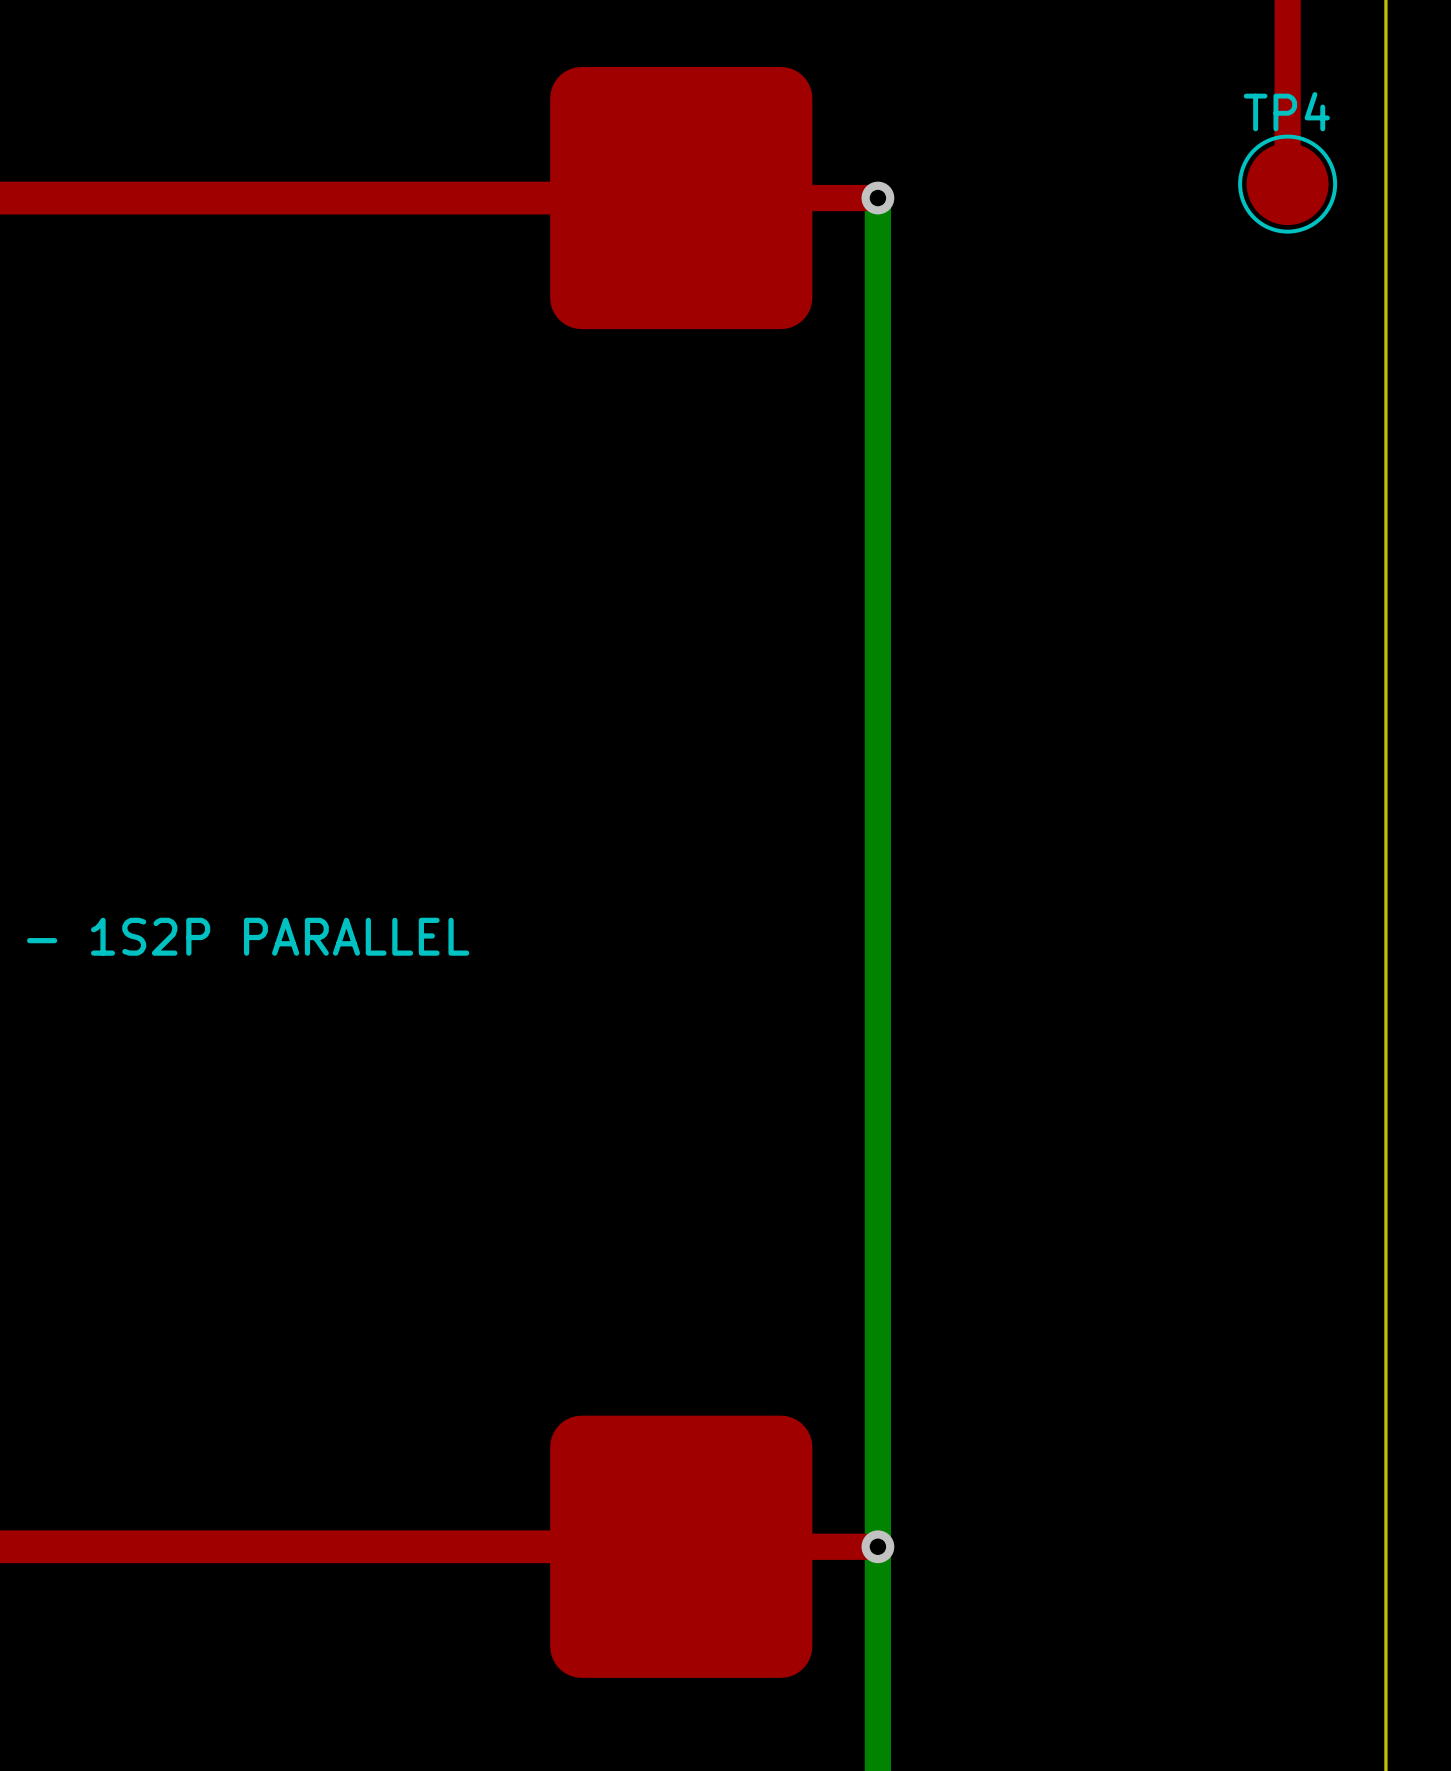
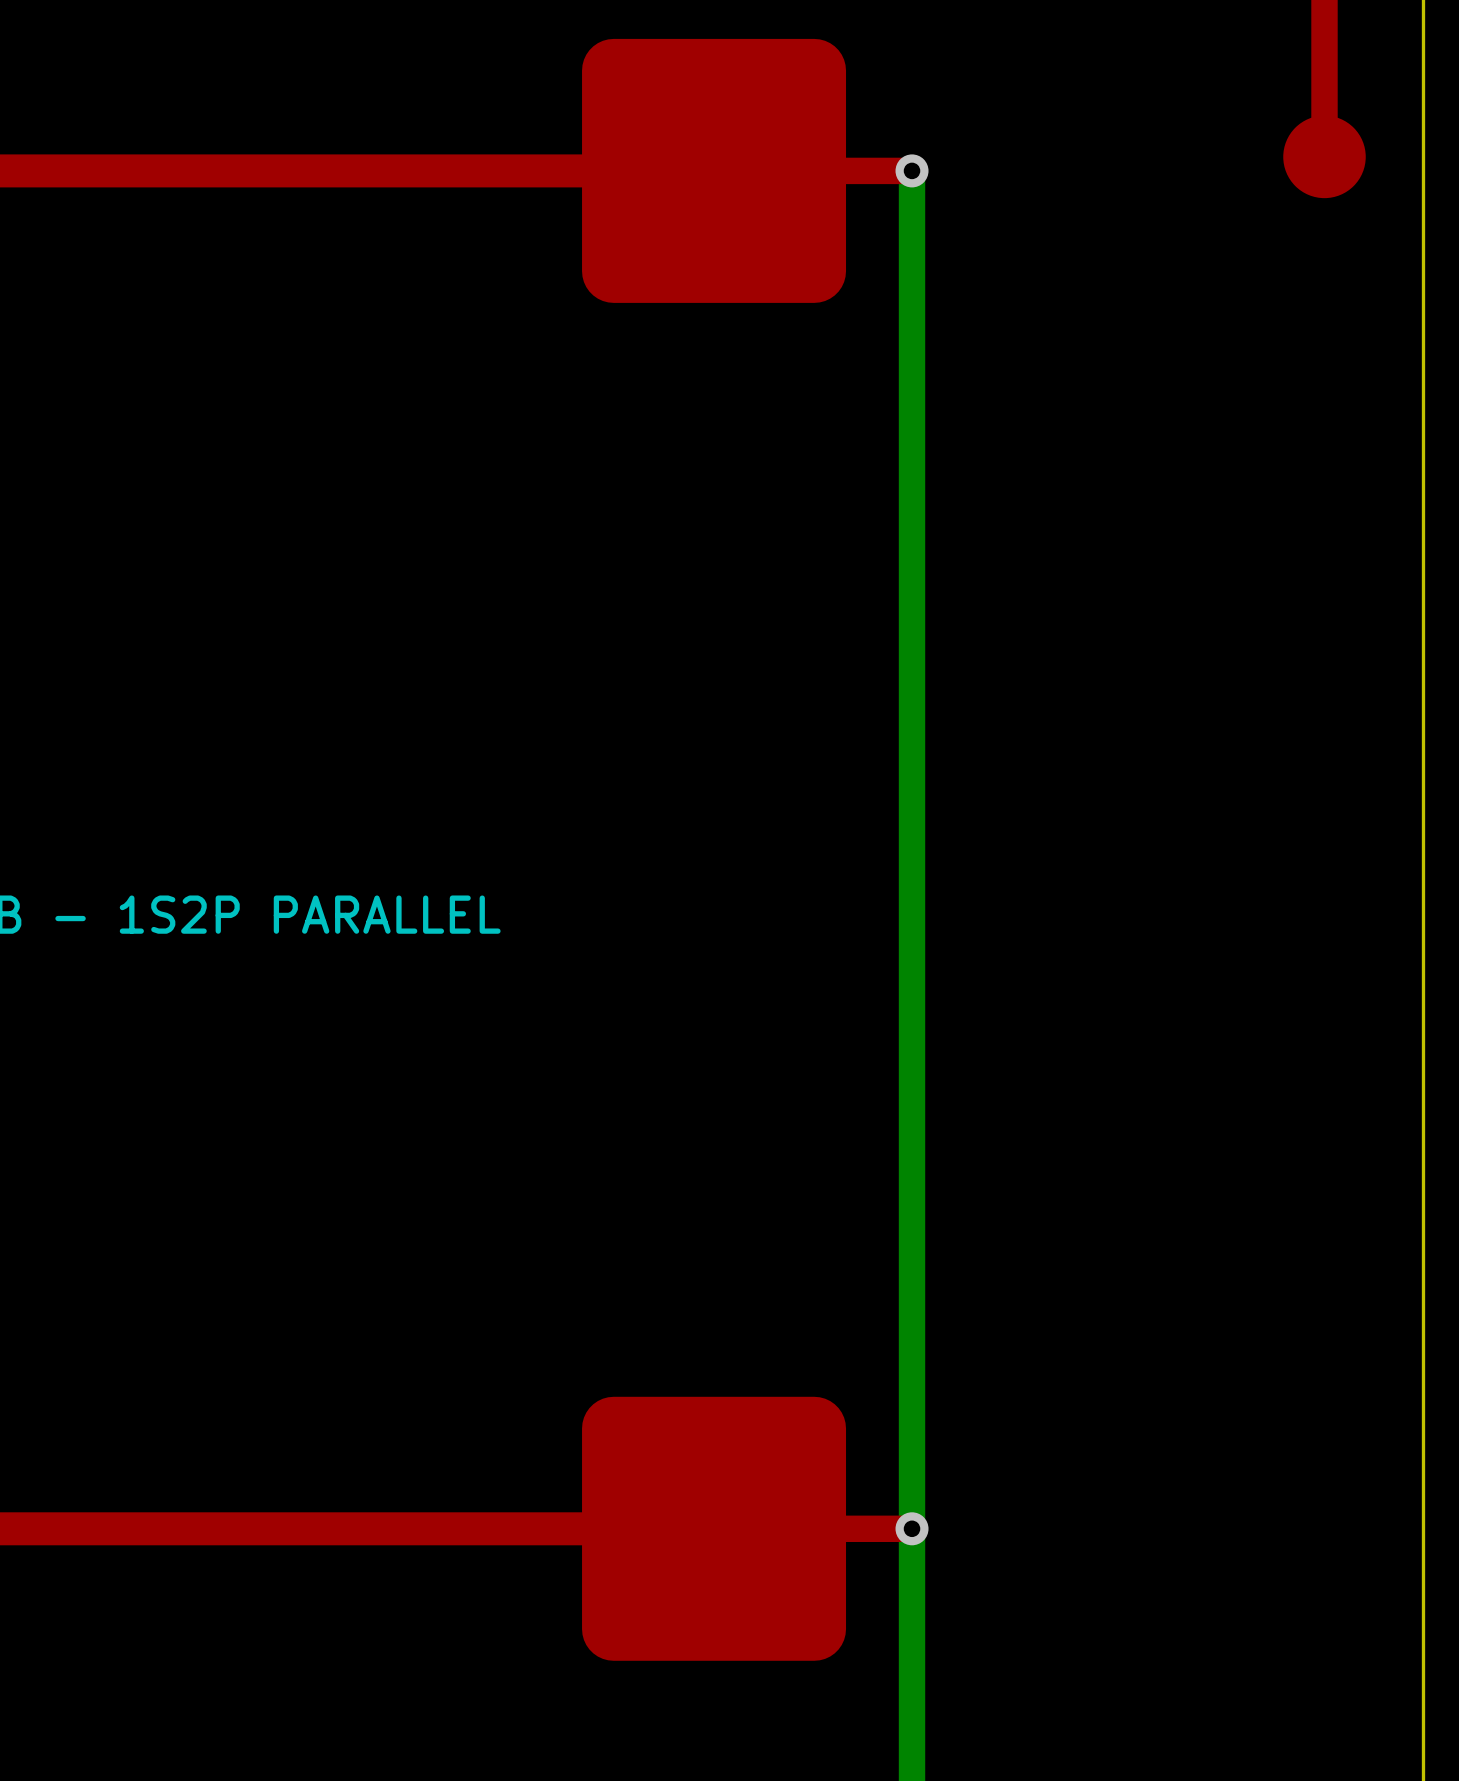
TP4: (1287, 184) -> none

